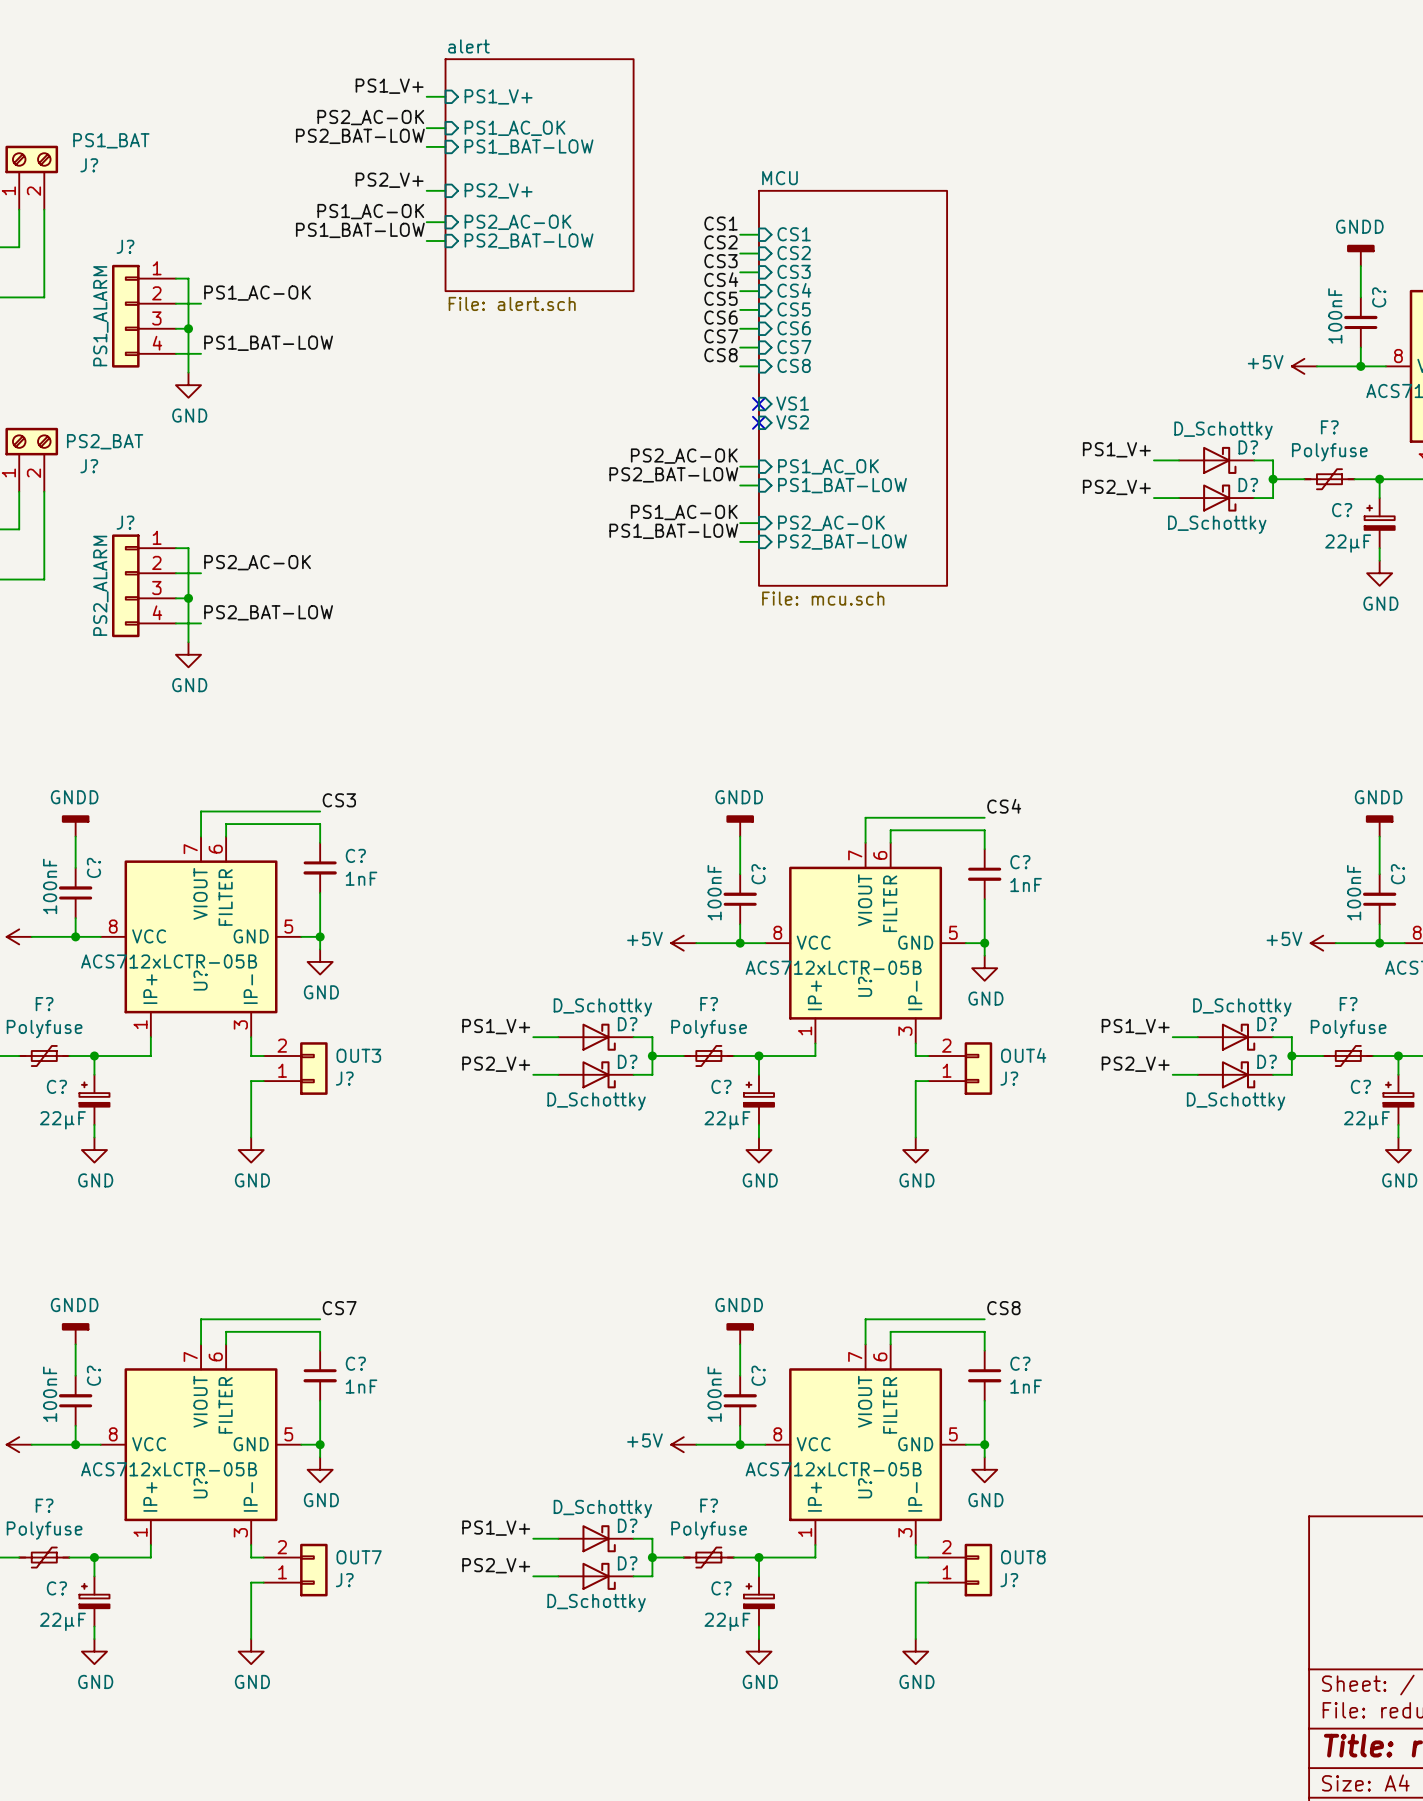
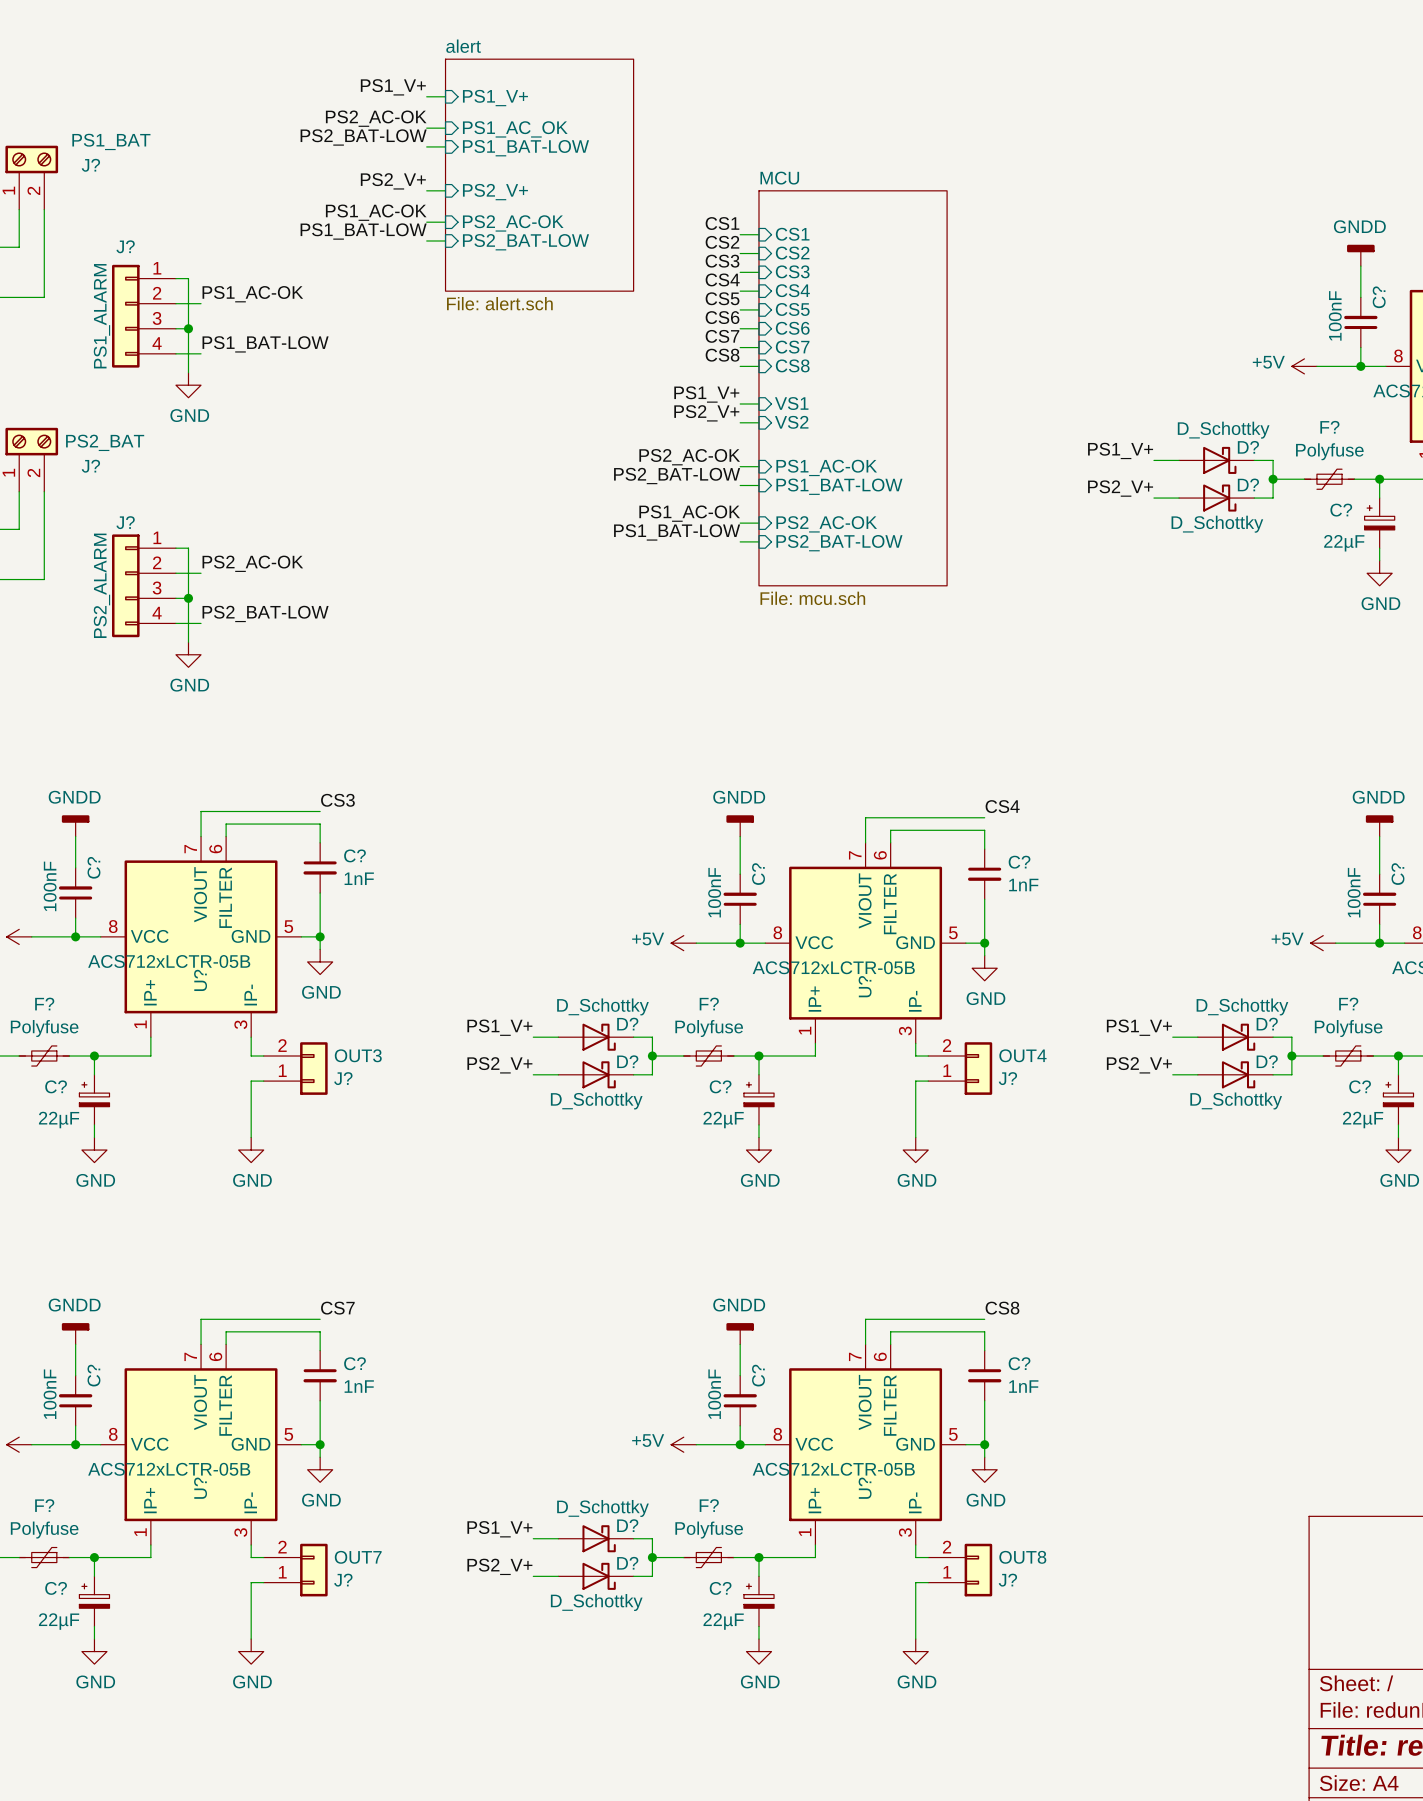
label: none -> PS1_V+ (706, 394)
wire: none -> (740, 403) (758, 403)
no-connect mark: (758, 403) -> none
label: none -> PS2_V+ (706, 413)
wire: none -> (740, 422) (758, 422)
no-connect mark: (758, 422) -> none
sheet pin: PS1_AC_OK (828, 466) -> PS1_AC-OK (826, 467)

